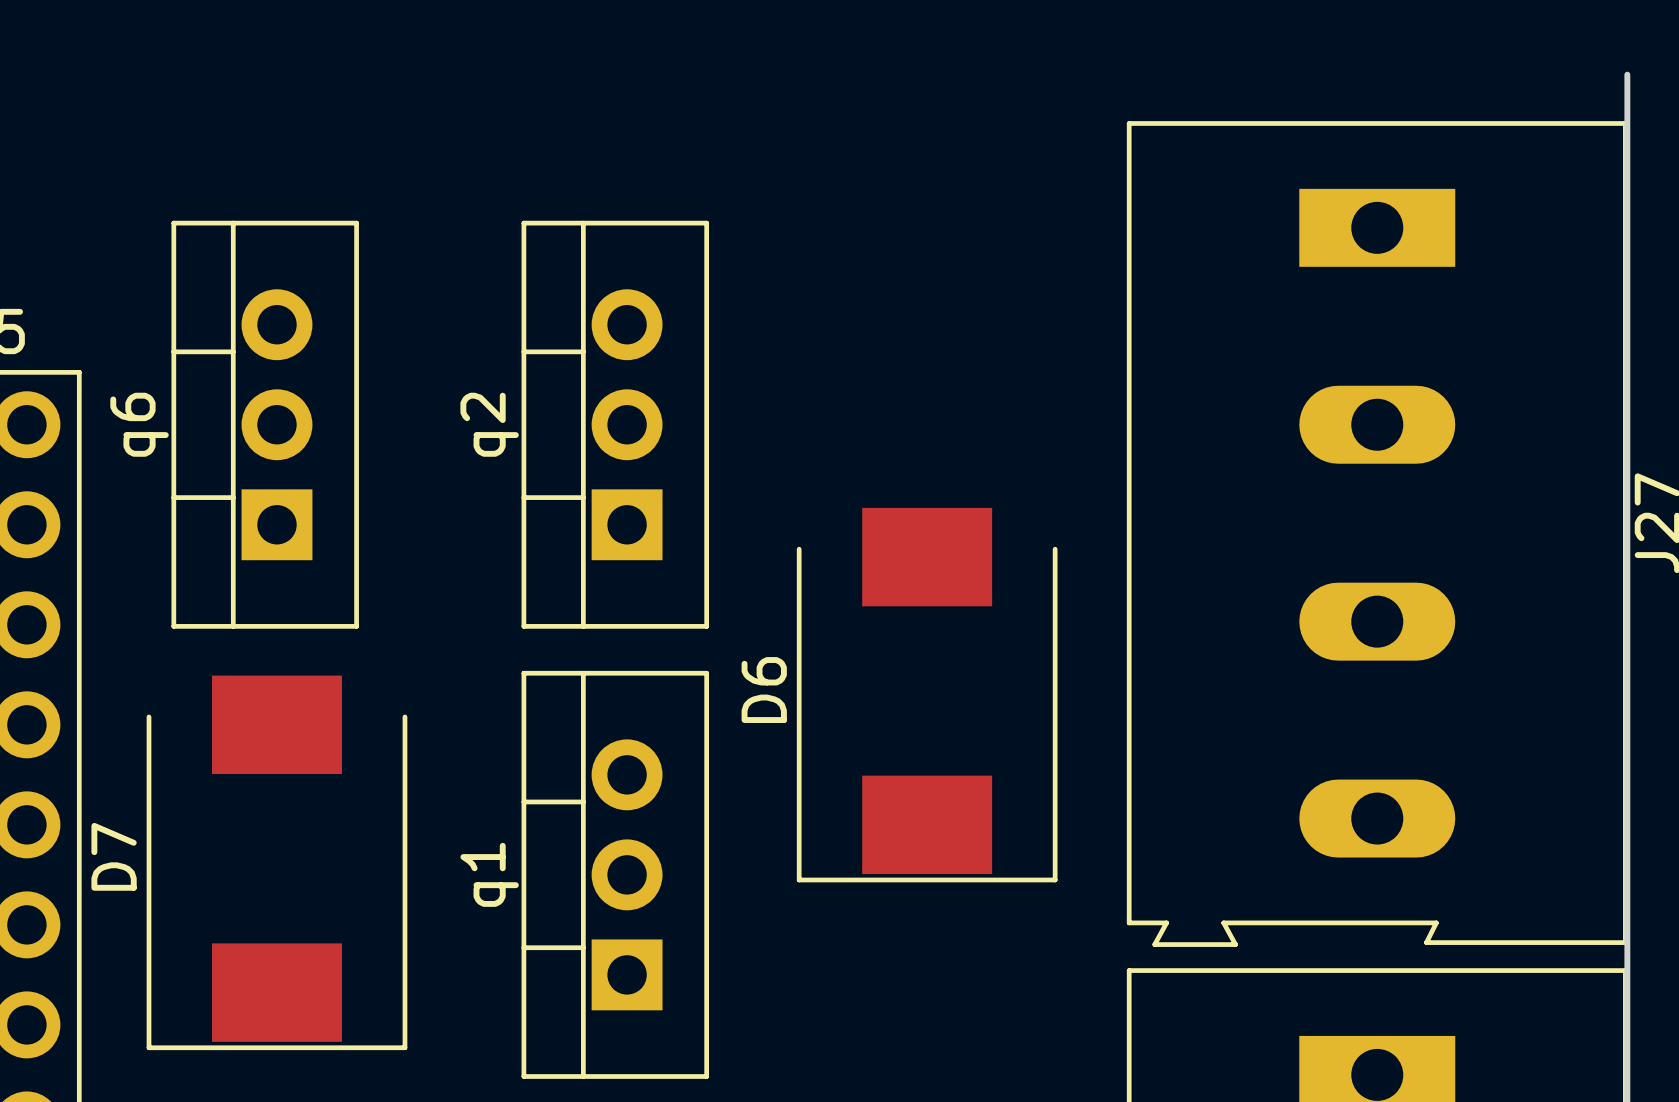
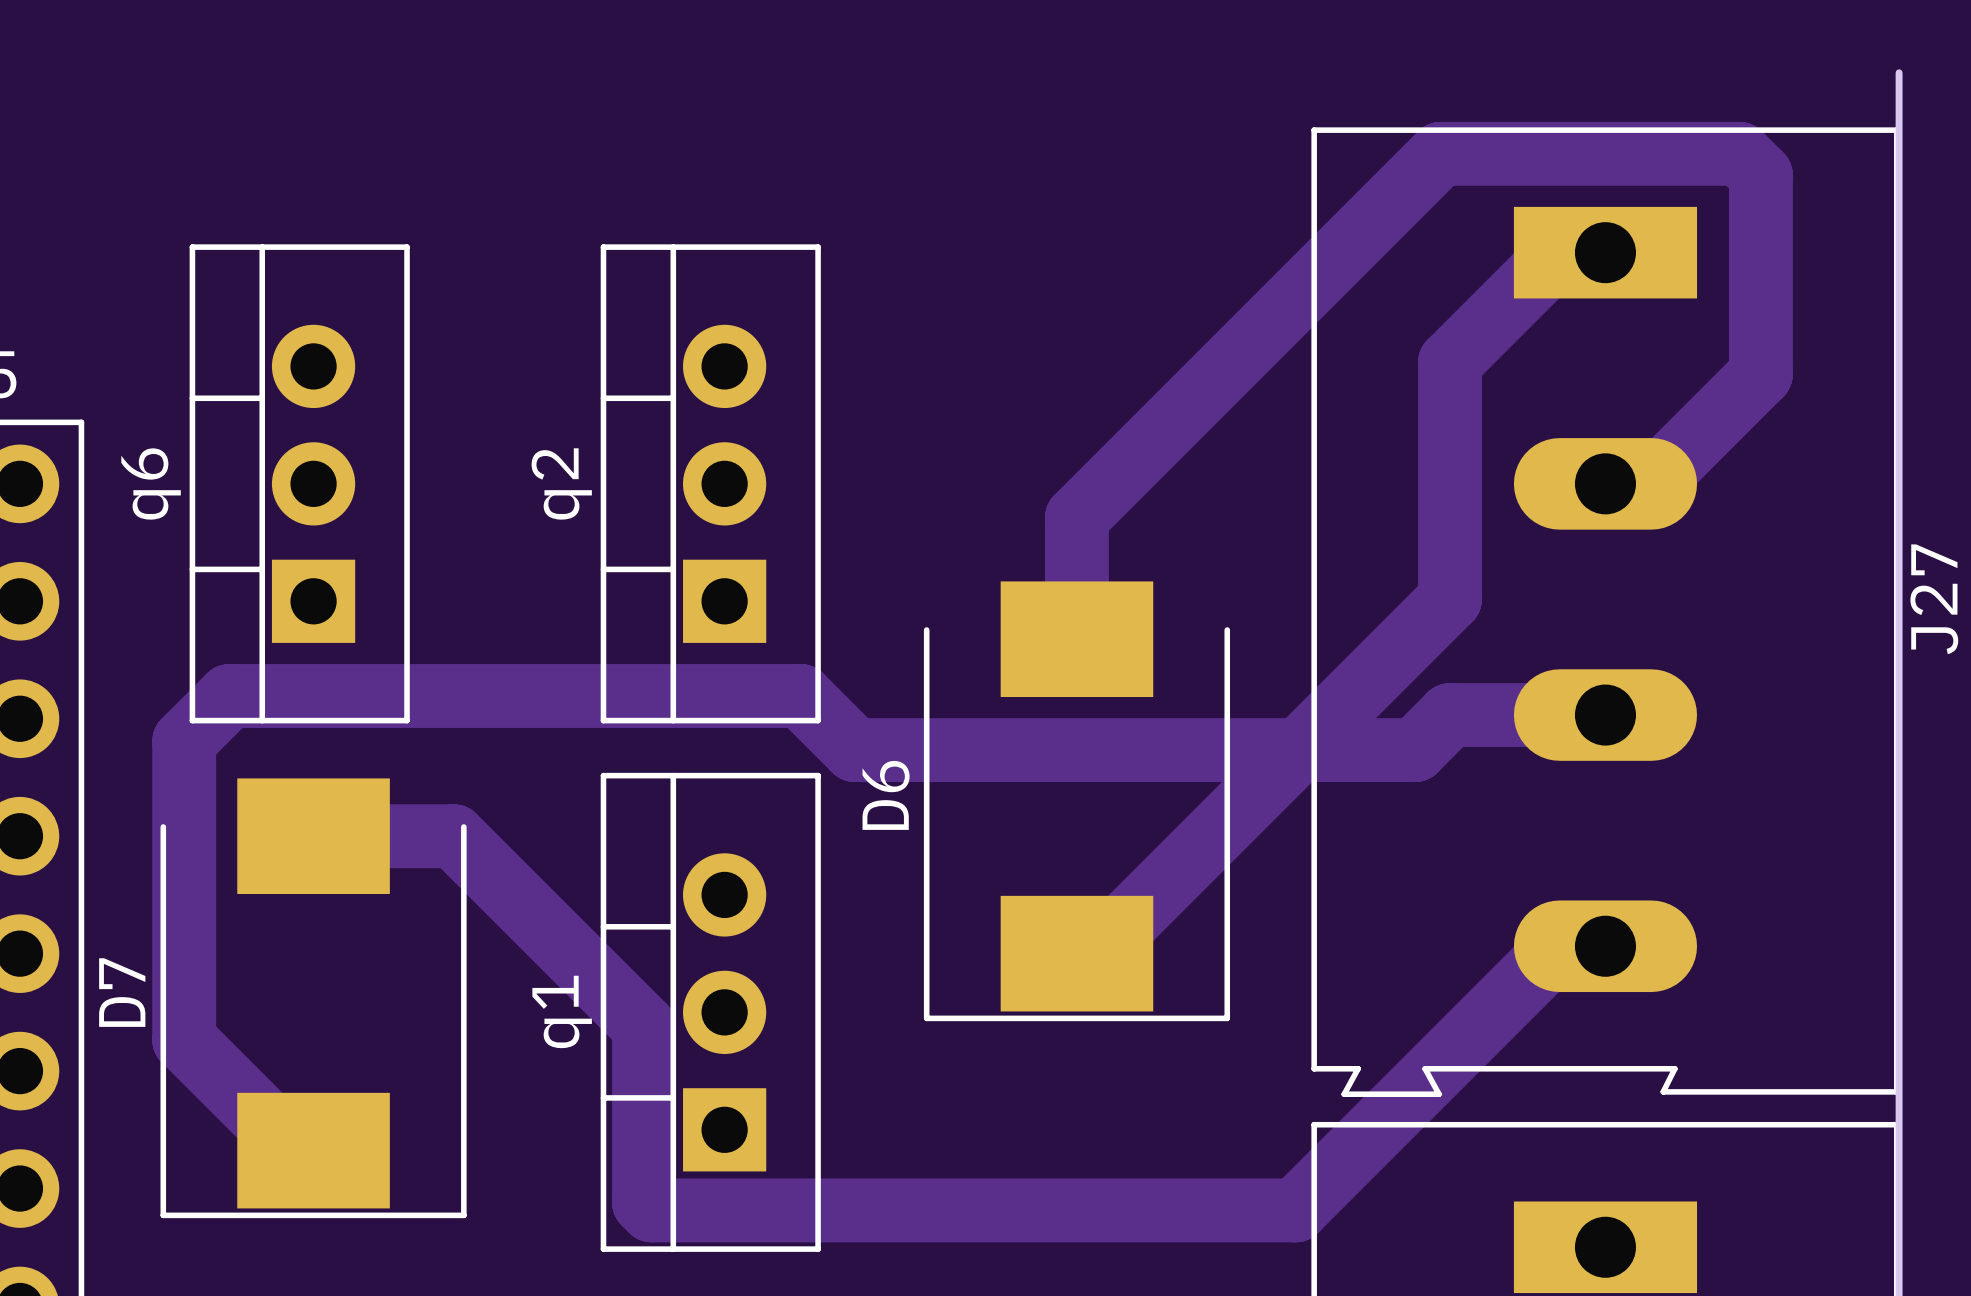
track: none -> (1605, 252) (1559, 252) (1450, 362) (1450, 599) (1095, 953) (1076, 953)
track: none -> (1605, 483) (1651, 483) (1760, 374) (1760, 175) (1739, 153) (1440, 153) (1076, 517) (1076, 639)
track: none -> (1605, 715) (1450, 715) (1414, 750) (854, 750) (800, 696) (229, 696) (184, 741) (184, 1039) (295, 1150) (313, 1150)
track: none -> (313, 836) (453, 836) (644, 1026) (644, 1202) (651, 1210) (1295, 1210) (1559, 946) (1605, 946)

